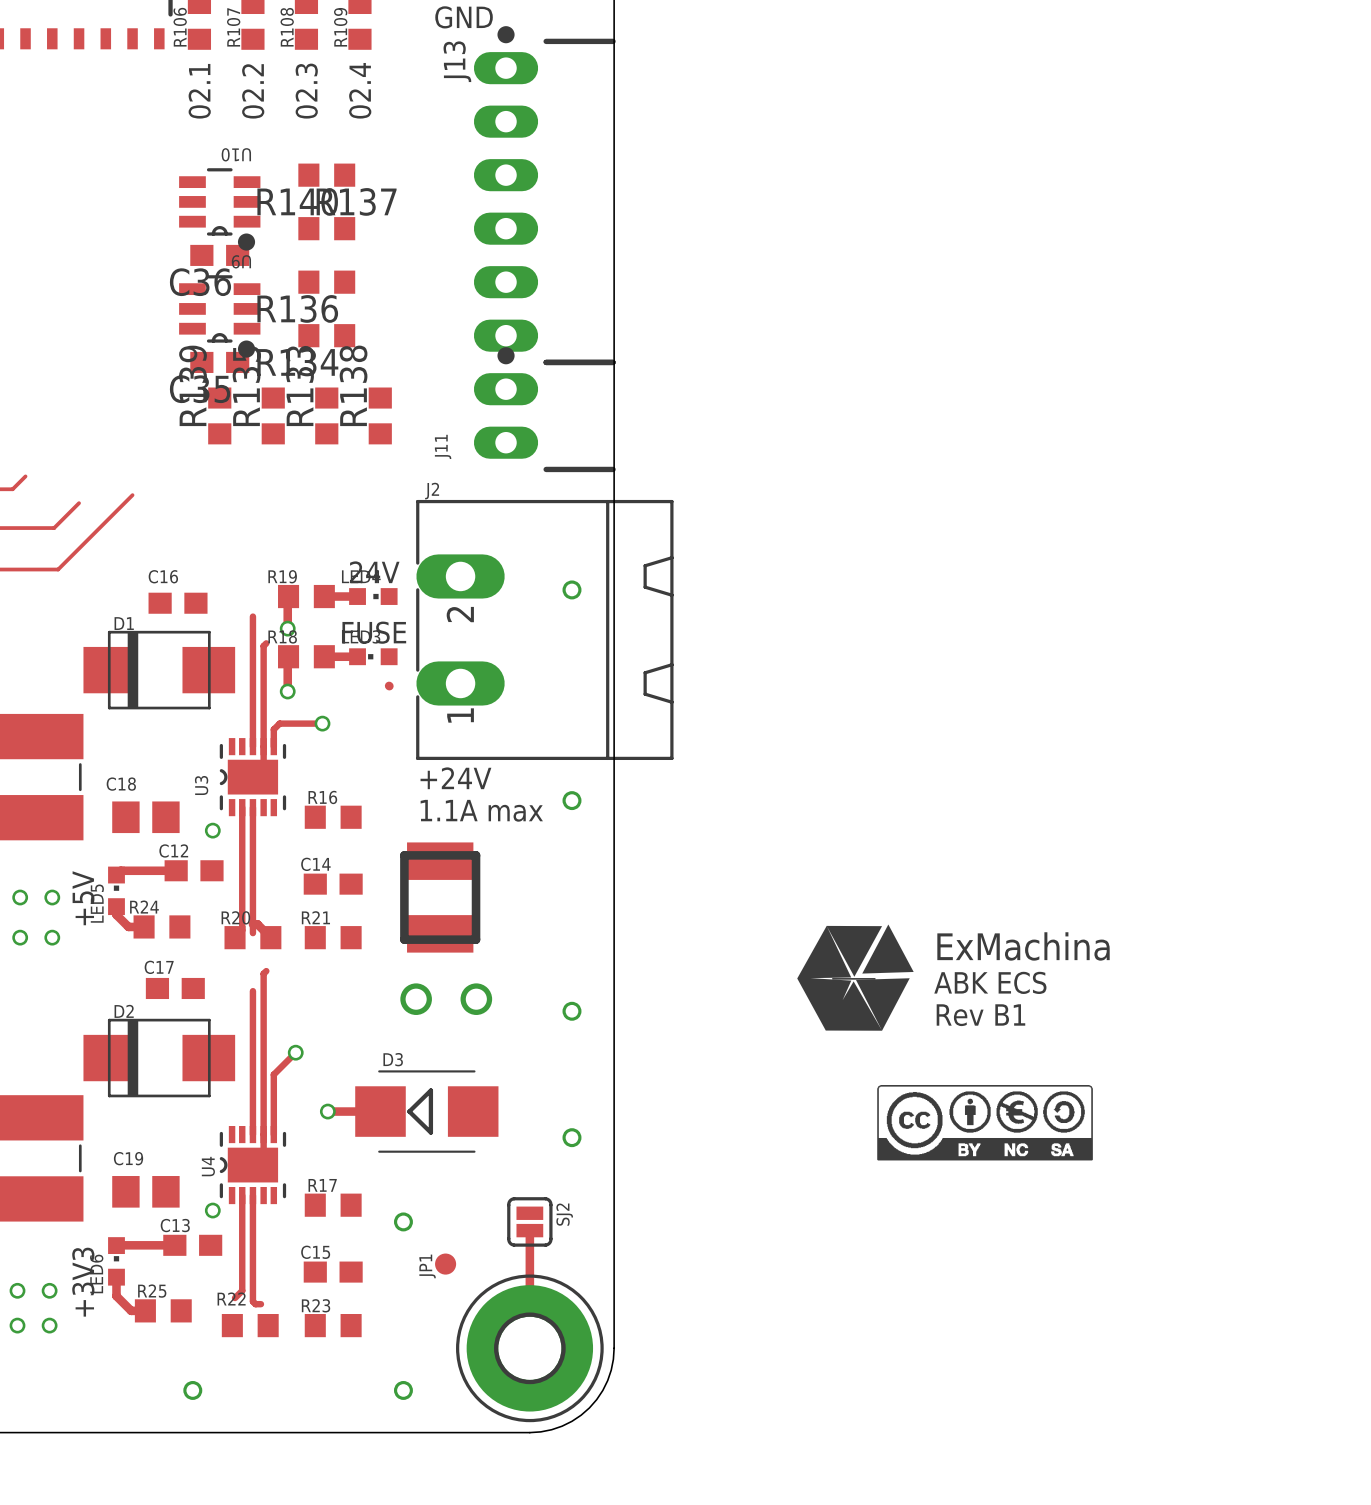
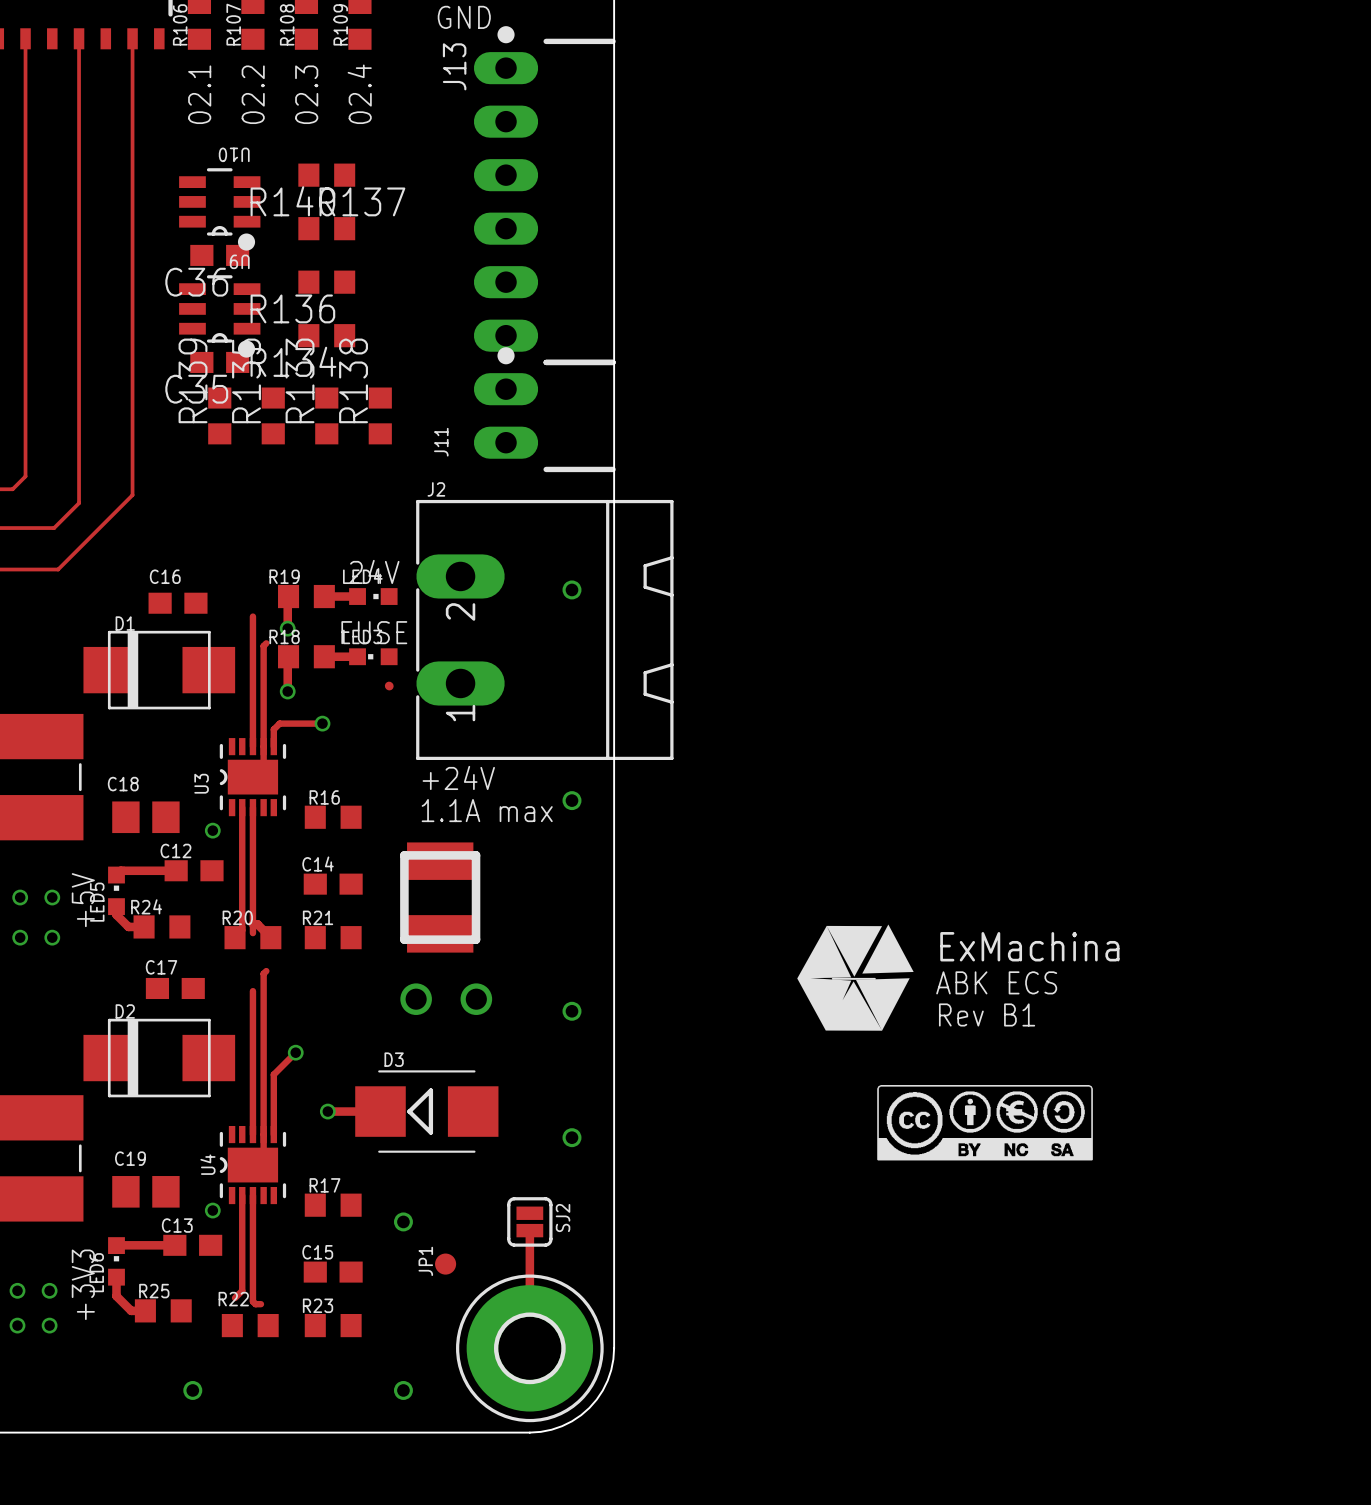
track: none -> (25, 38) (25, 476)
track: none -> (79, 38) (79, 503)
track: none -> (132, 38) (132, 495)

